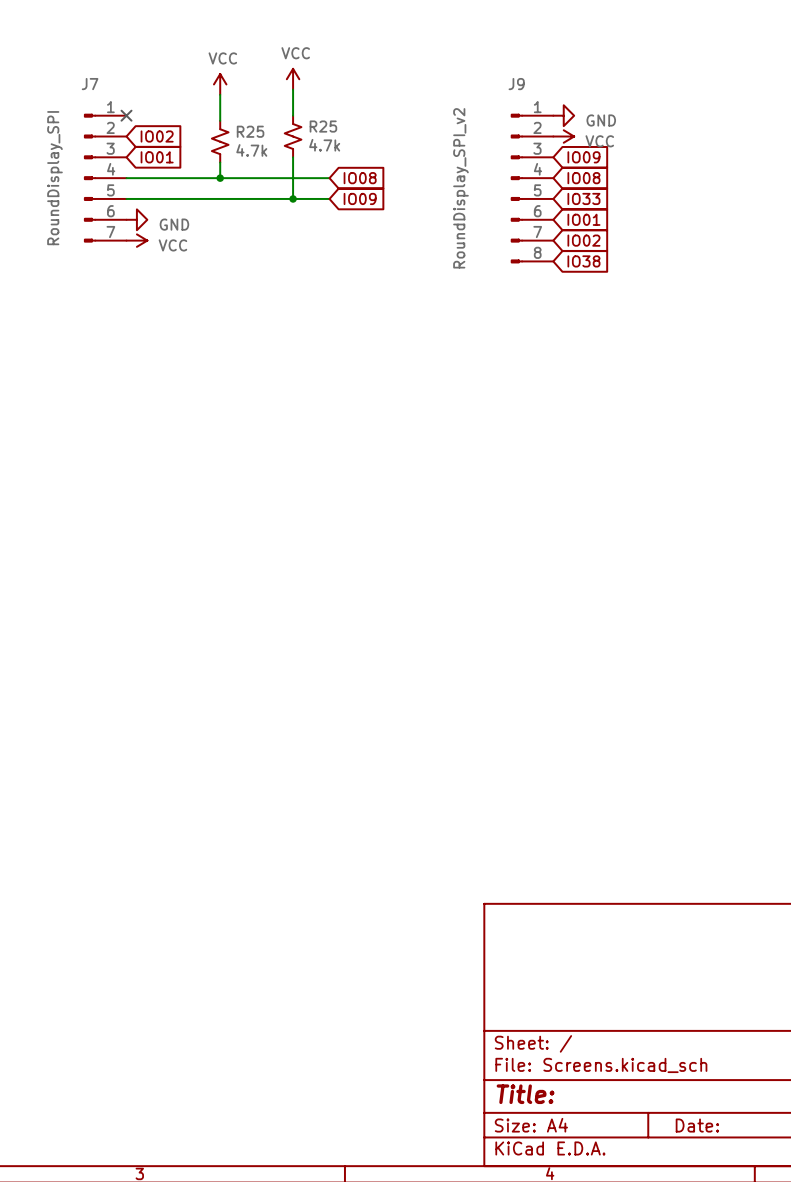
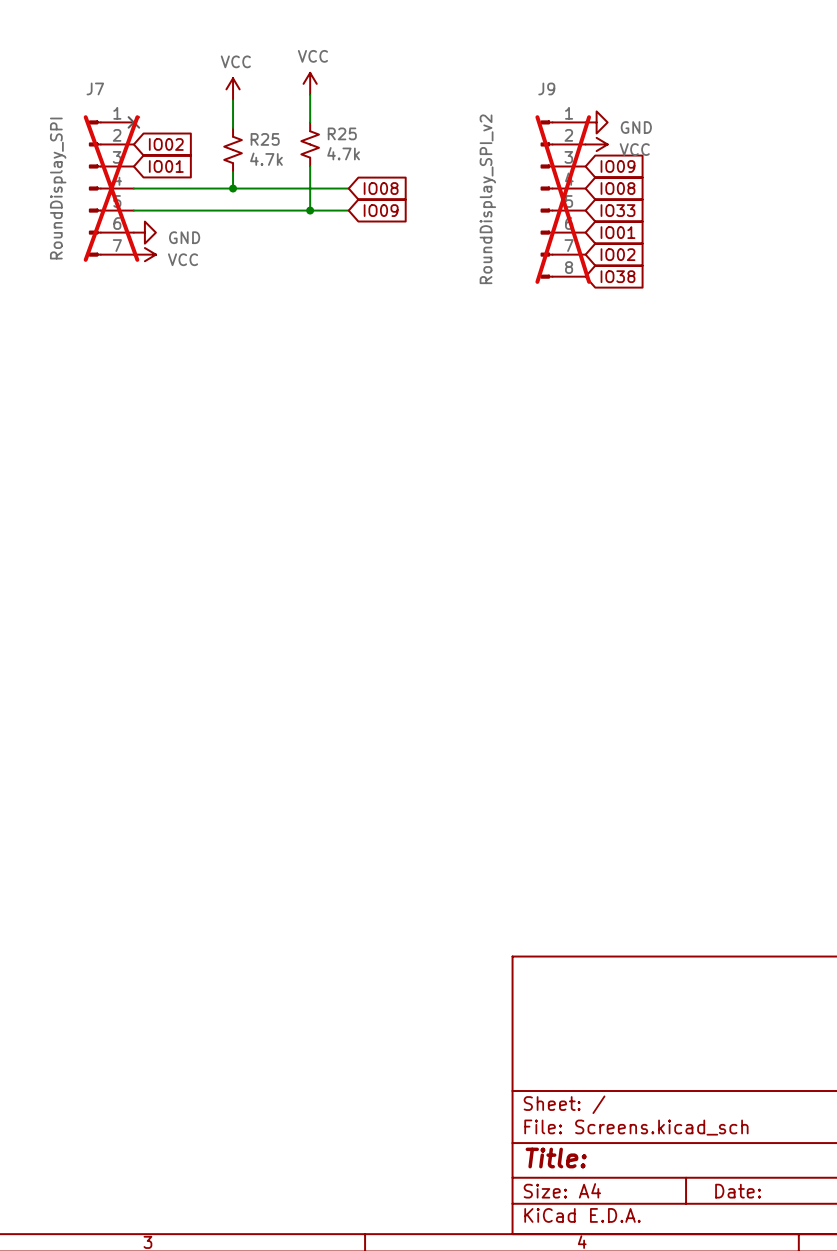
J7 do-not-place cross: none -> (111, 188)
J9 do-not-place cross: none -> (563, 199)

